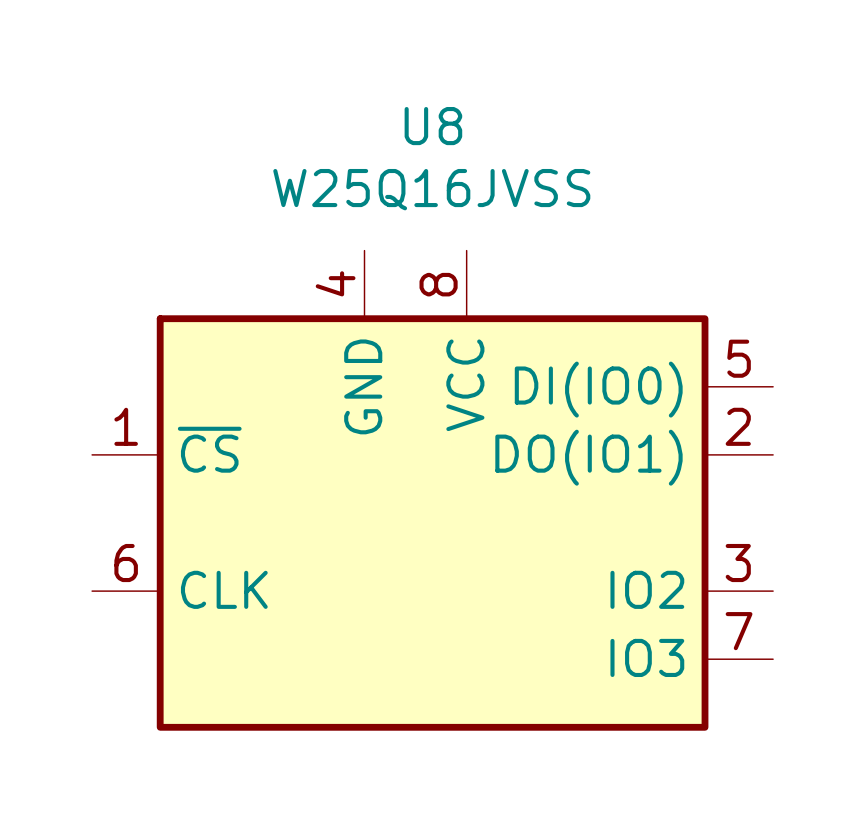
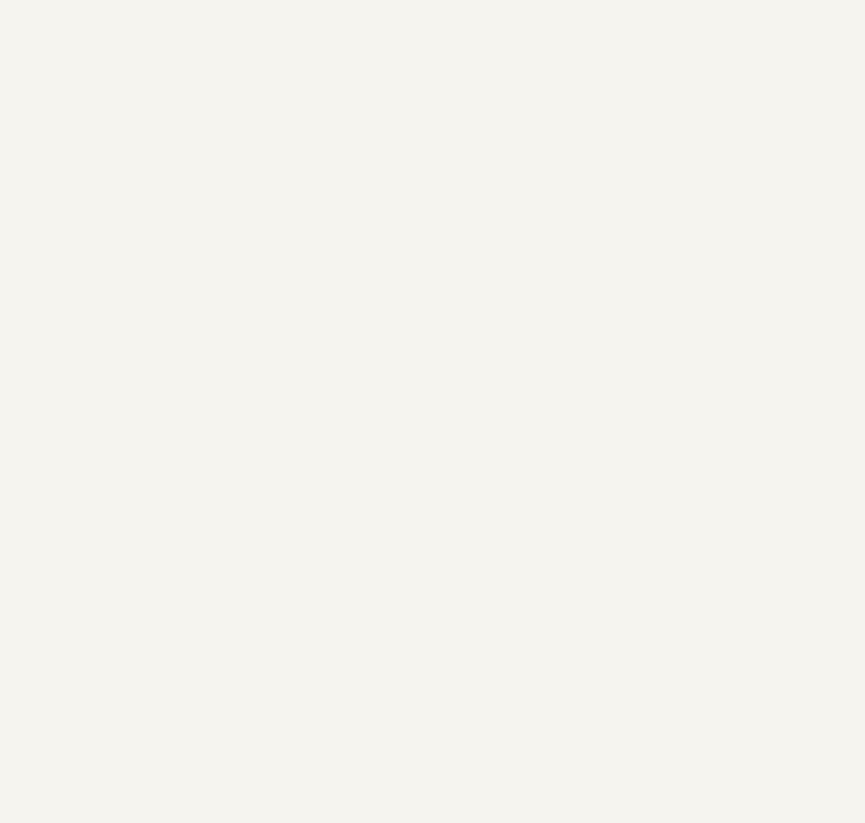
U8: W25Q16JVSS (432, 490) -> none

